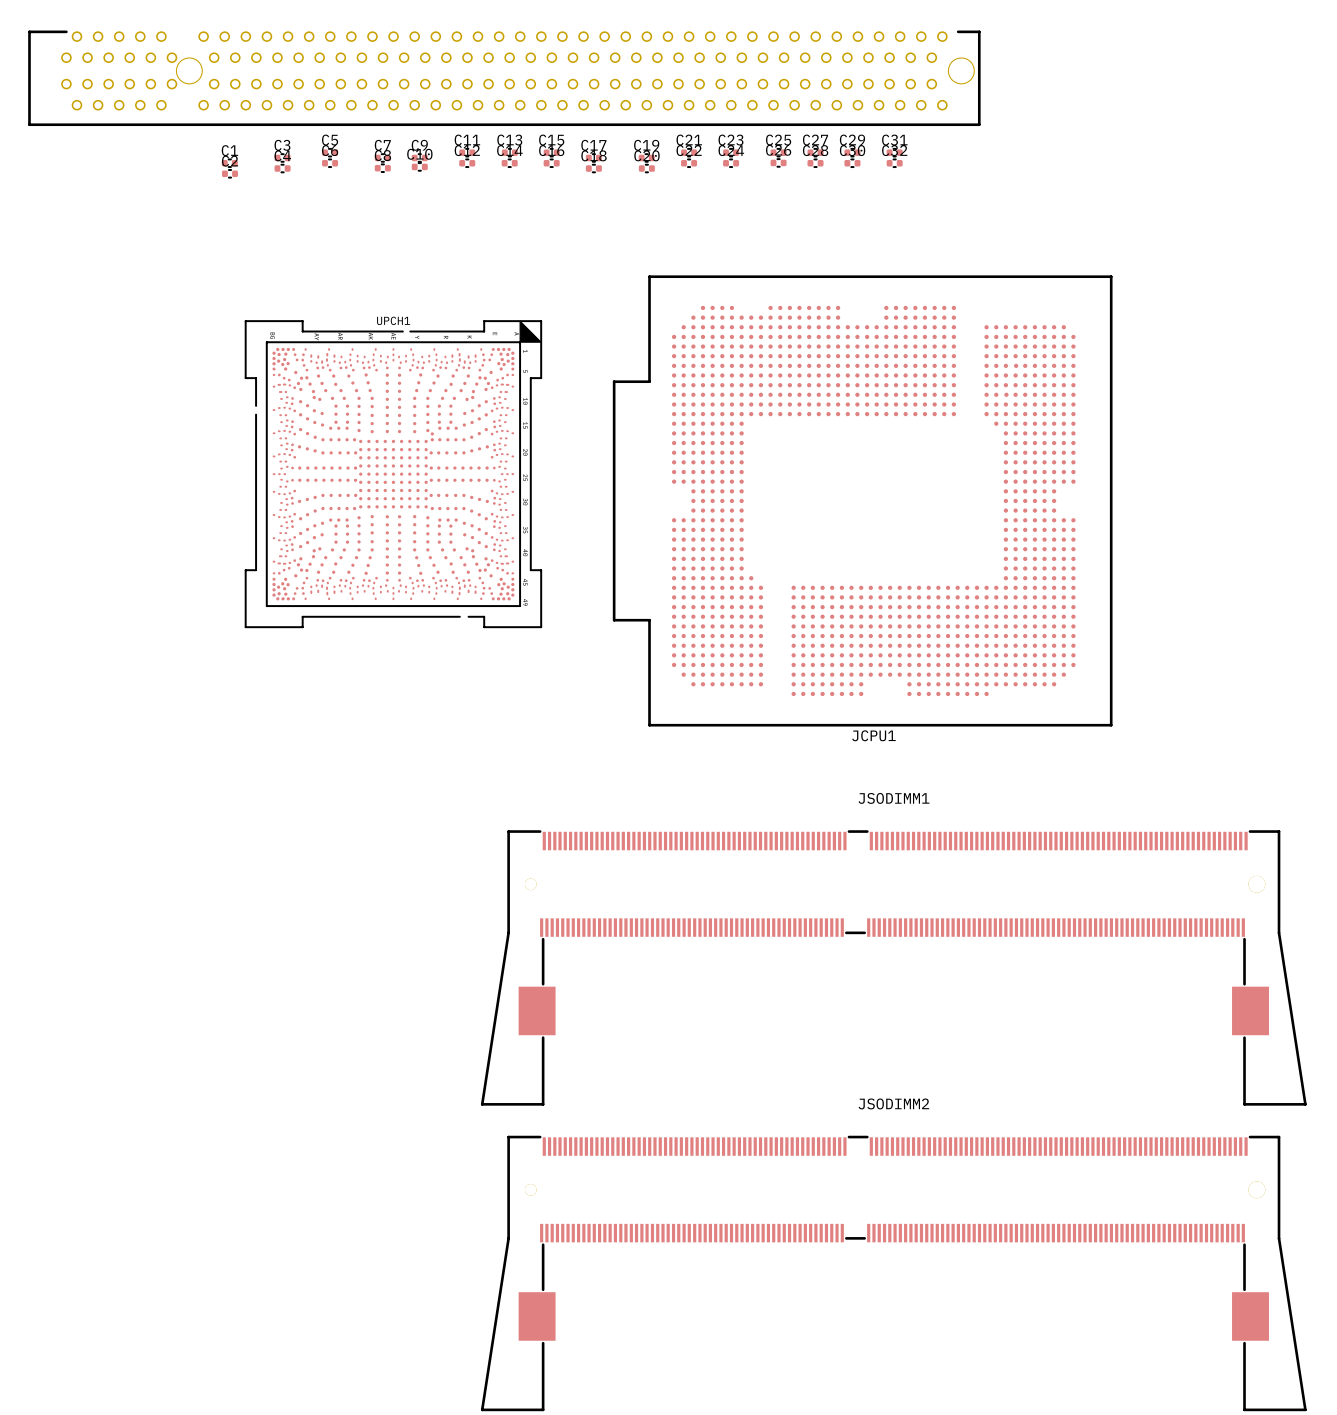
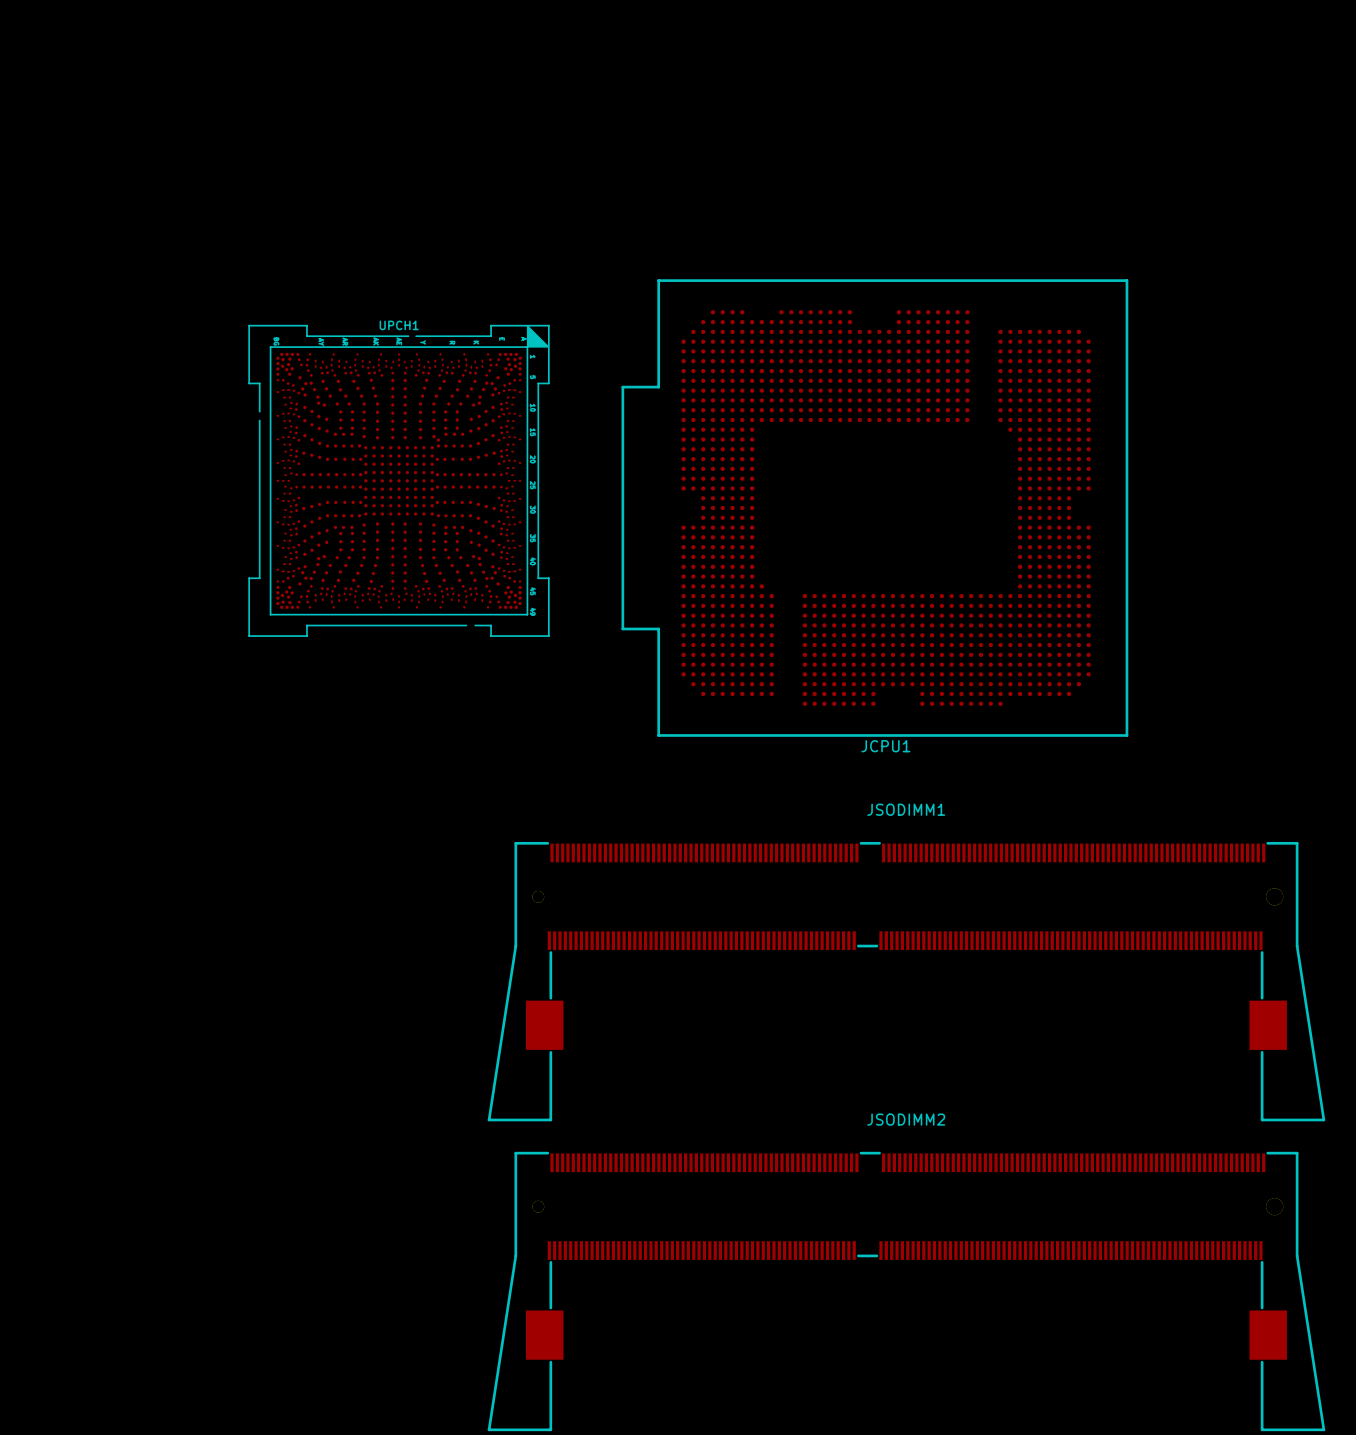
part: (504, 78) -> none
C5: (330, 152) -> none
C11: (467, 152) -> none
C13: (509, 152) -> none
C15: (551, 152) -> none
C21: (689, 152) -> none
C23: (731, 152) -> none
C25: (778, 152) -> none
C27: (815, 152) -> none
C29: (852, 152) -> none
C31: (894, 152) -> none
C3: (282, 157) -> none
C7: (382, 157) -> none
C9: (419, 157) -> none
C17: (593, 157) -> none
C19: (646, 157) -> none
C26: (778, 162) -> none
C1: (229, 163) -> none
C6: (330, 163) -> none
C12: (467, 163) -> none
C14: (509, 163) -> none
C16: (551, 163) -> none
C22: (689, 163) -> none
C24: (731, 163) -> none
C28: (815, 163) -> none
C30: (852, 163) -> none
C32: (894, 163) -> none
C10: (419, 166) -> none
C4: (282, 168) -> none
C8: (382, 168) -> none
C18: (593, 168) -> none
C20: (646, 168) -> none
C2: (230, 173) -> none

